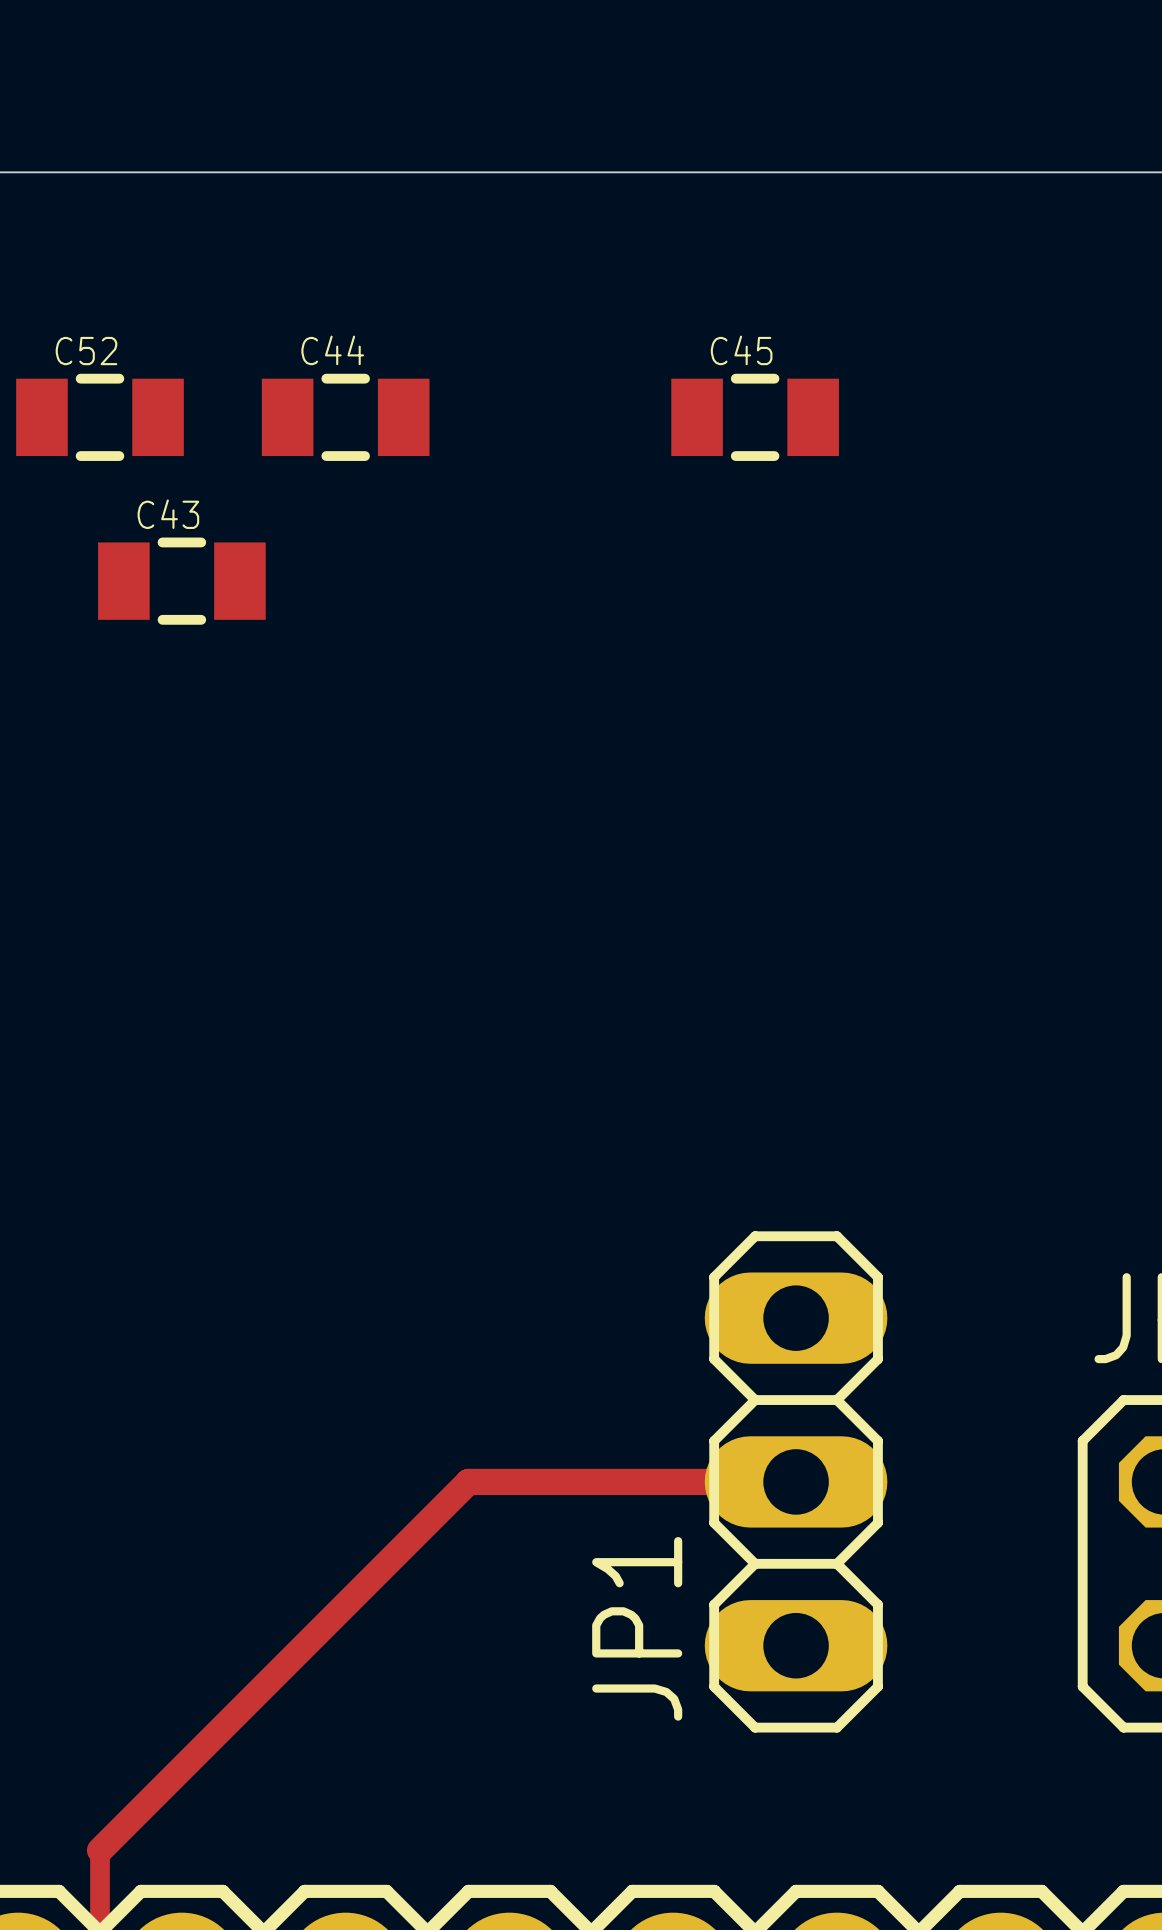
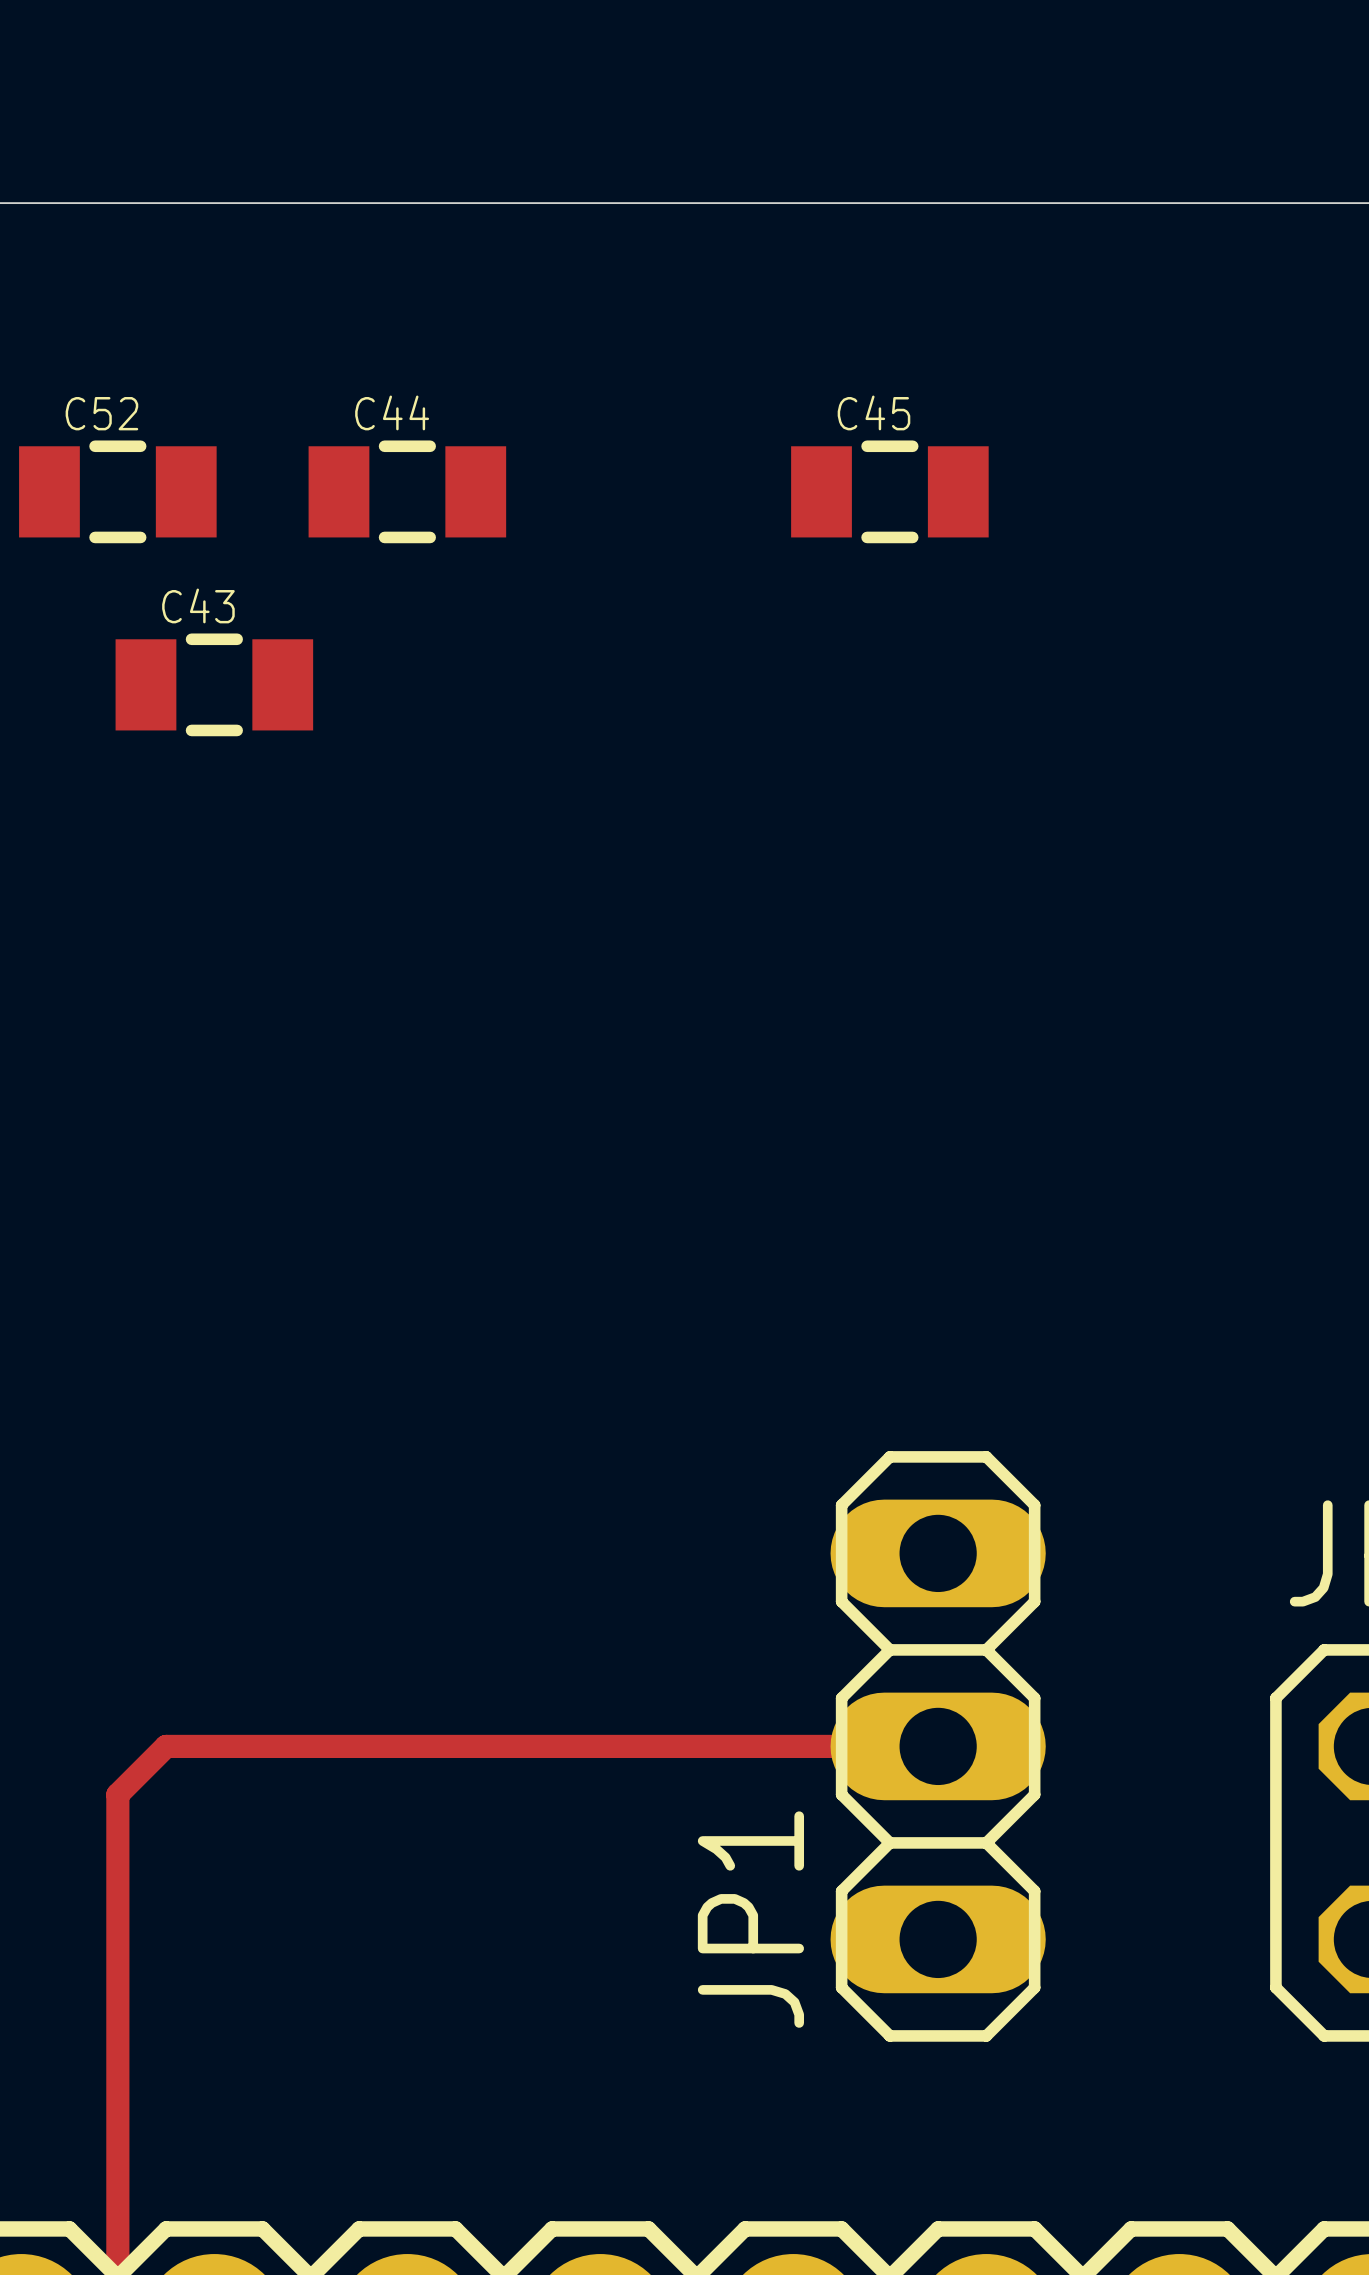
track: (468, 1481) (100, 1850) -> (552, 1746) (166, 1746) (117, 1794) (117, 2180)
track width: thick (468, 1481) (796, 1481) -> thin (552, 1746) (938, 1746)

